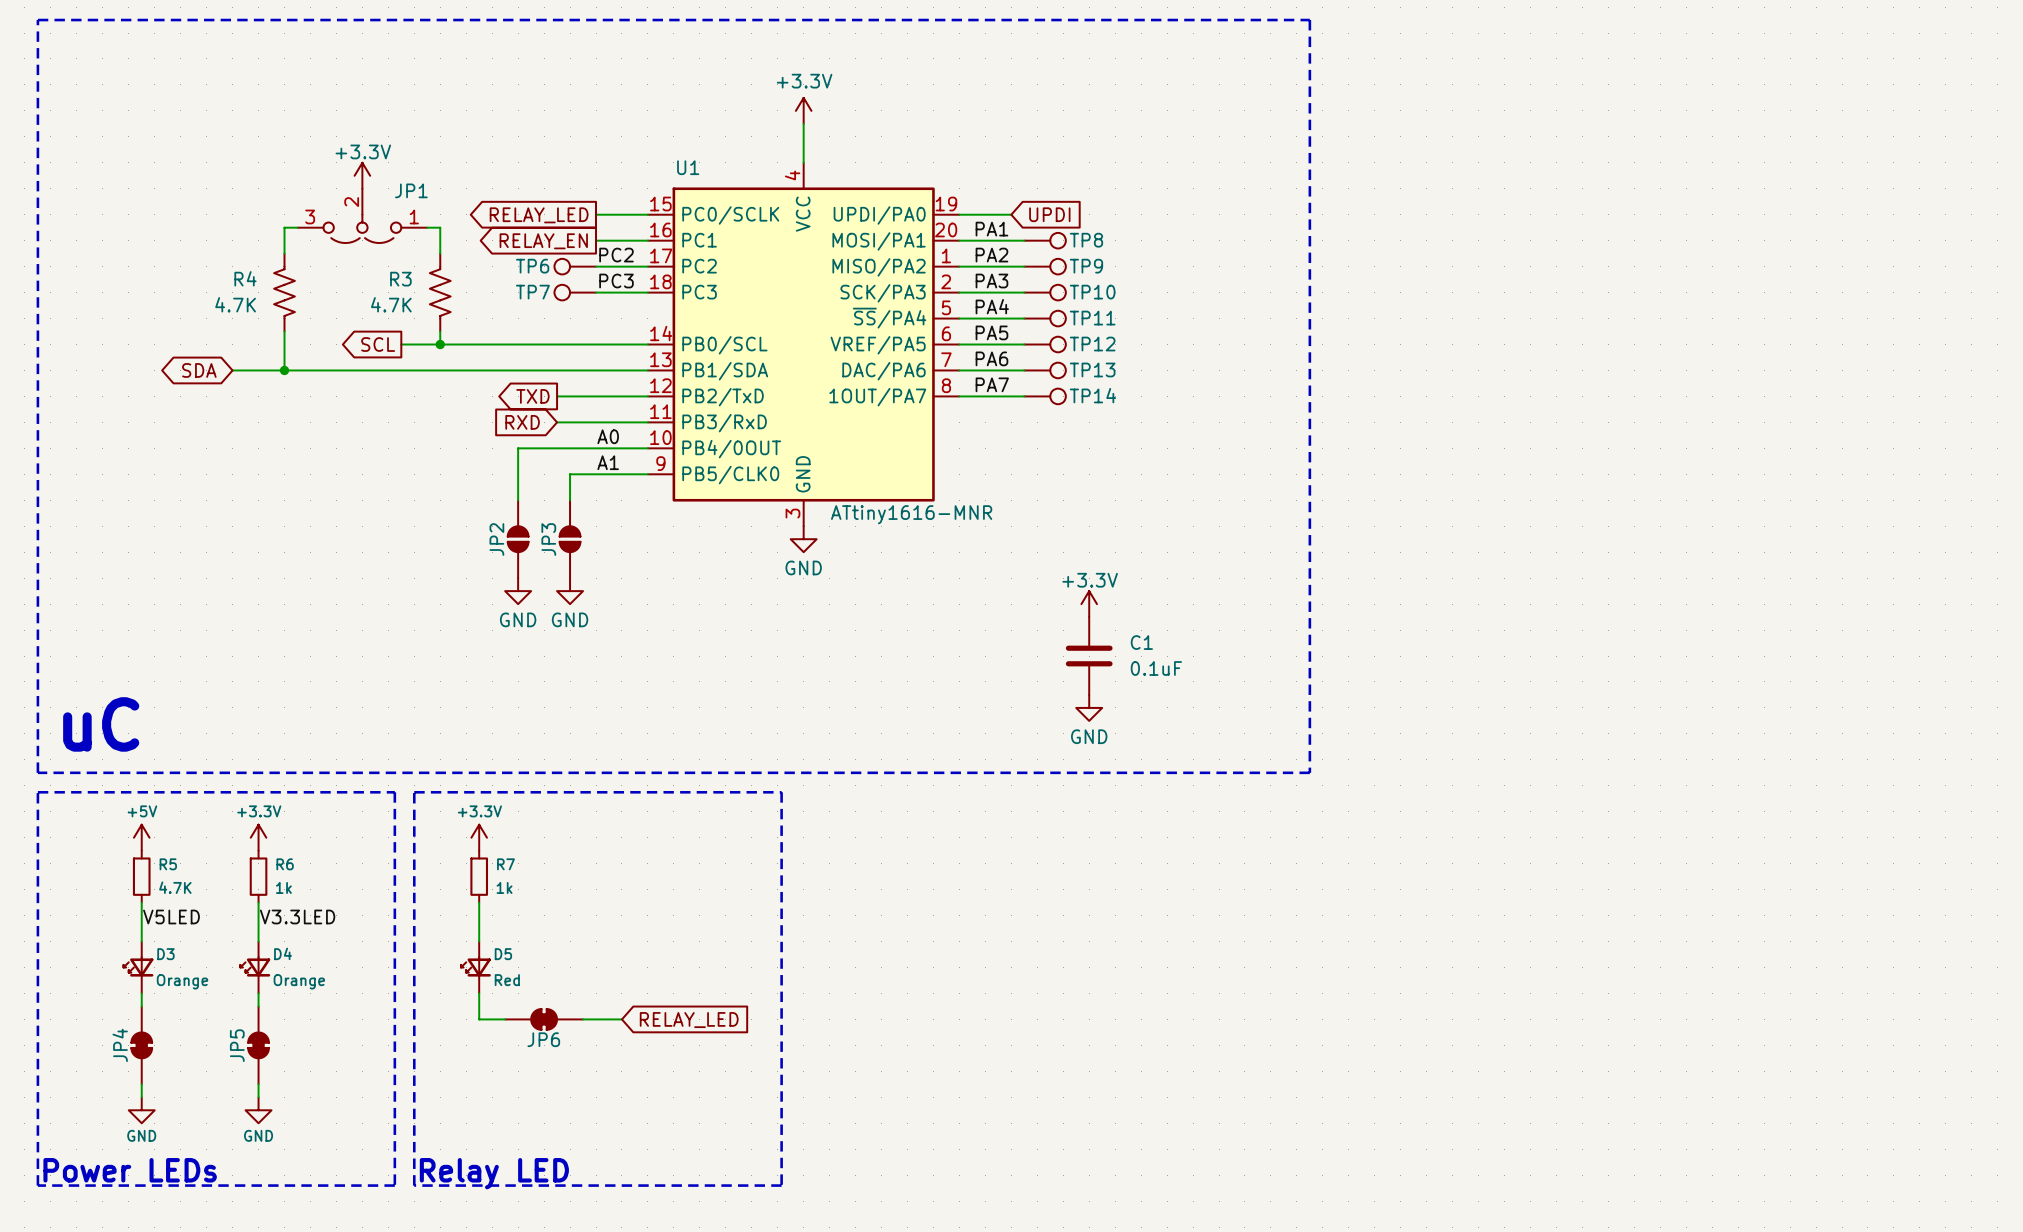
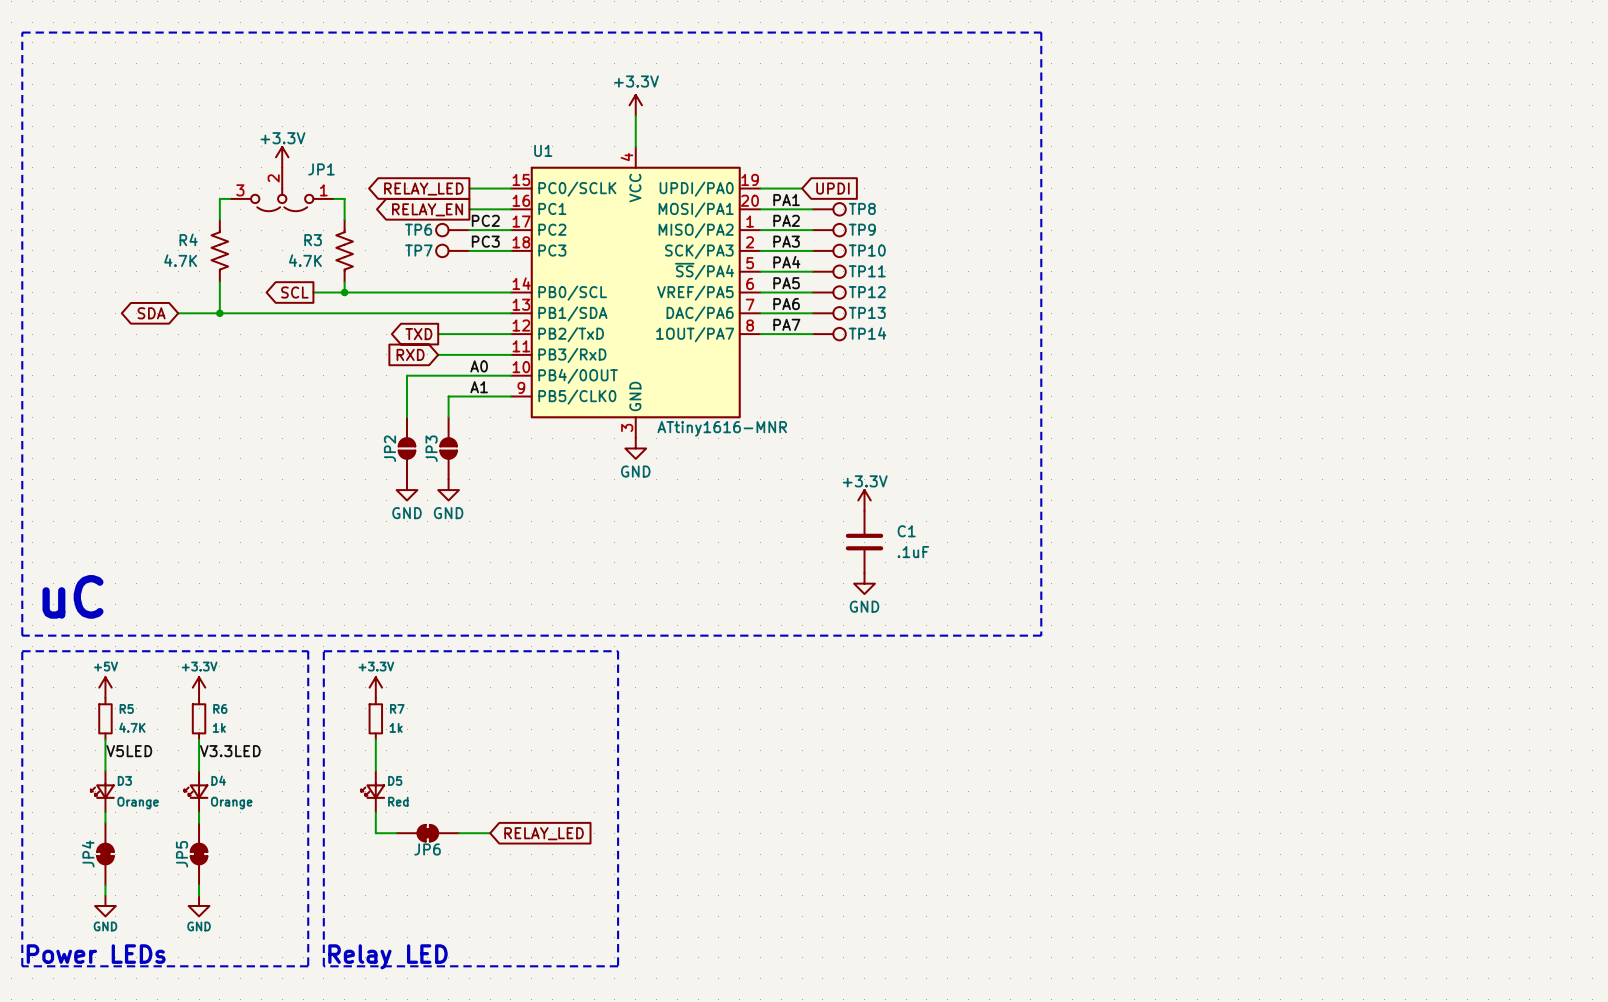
C1 value: 0.1uF (1156, 668) -> .1uF (913, 552)

